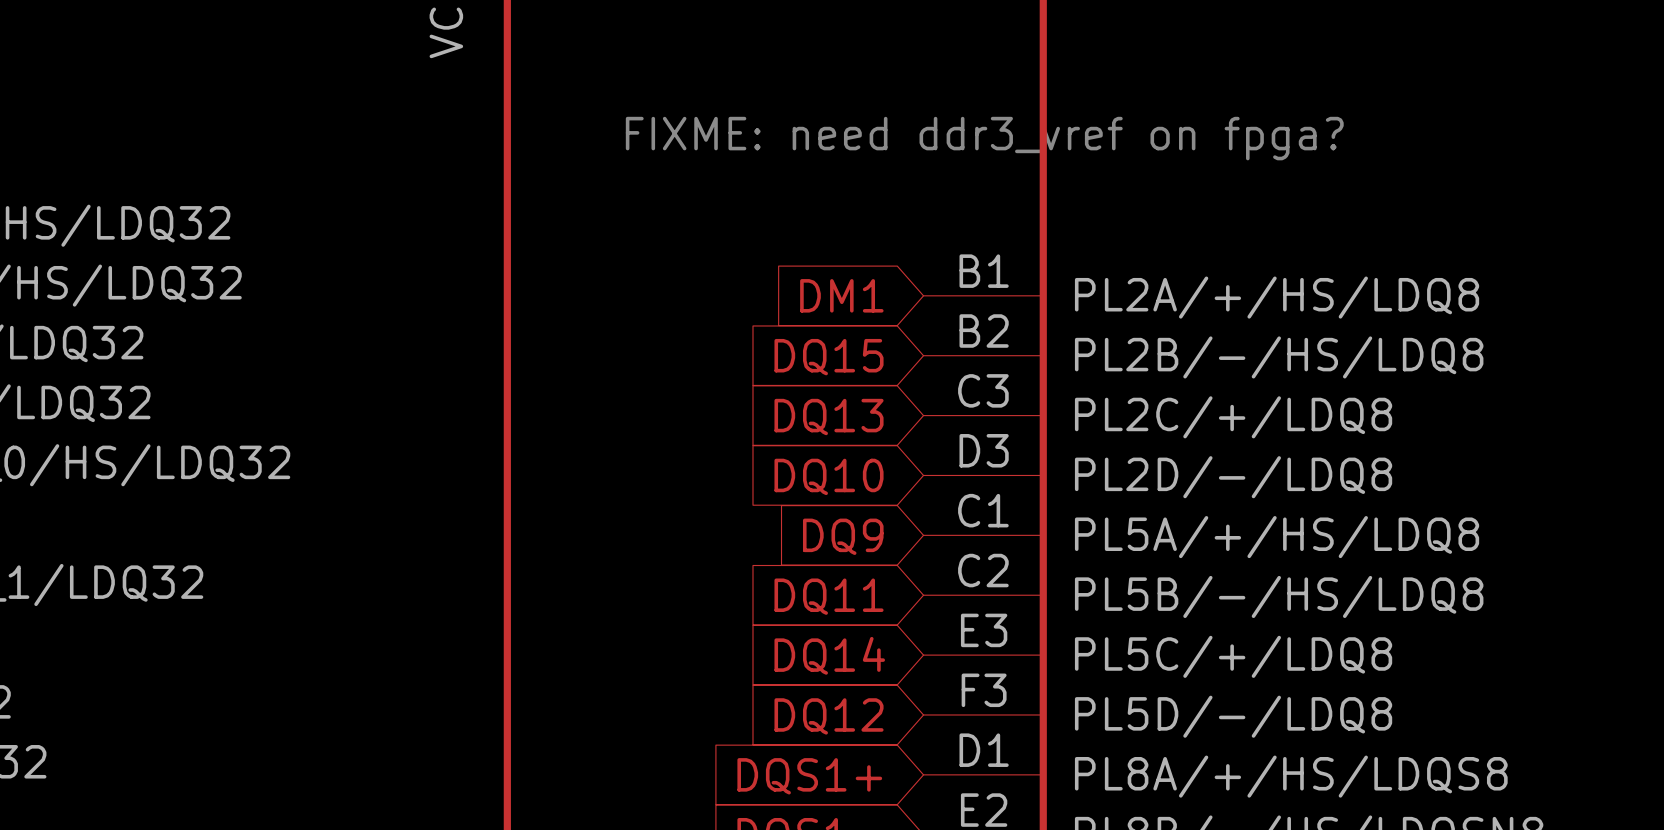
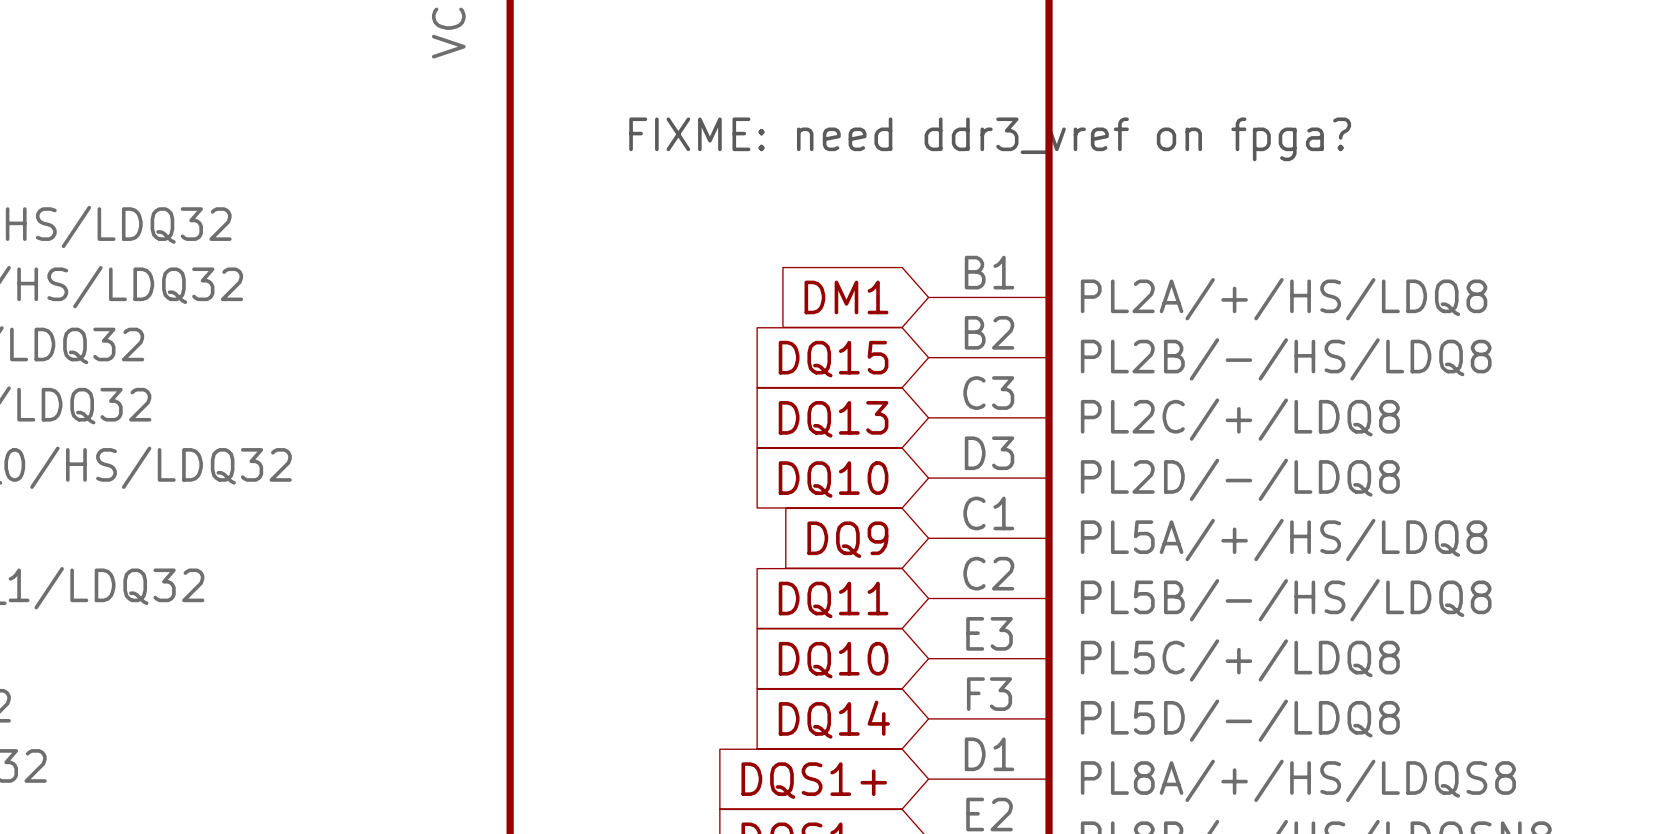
global label: DQ14 (829, 655) -> DQ10 (833, 660)
global label: DQ12 (829, 716) -> DQ14 (834, 719)

